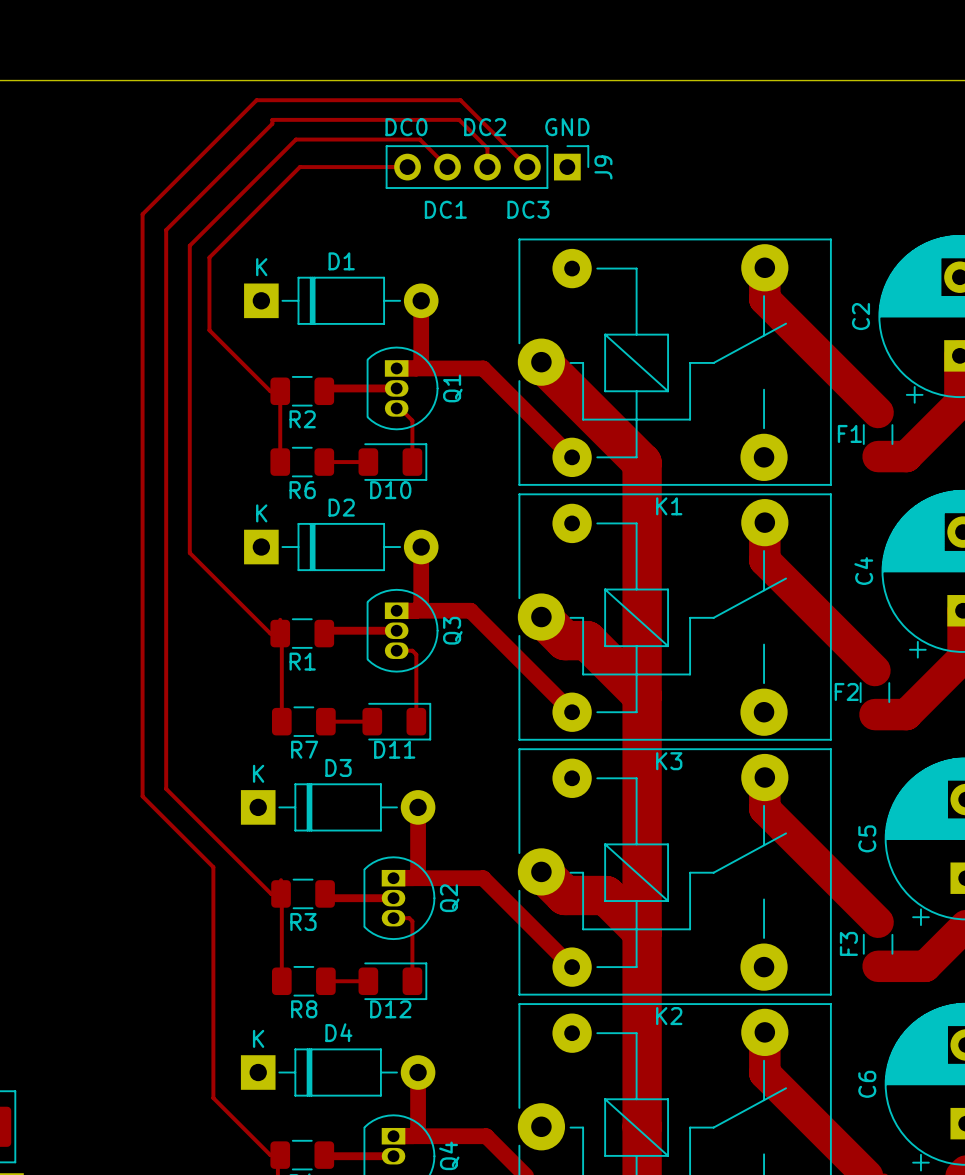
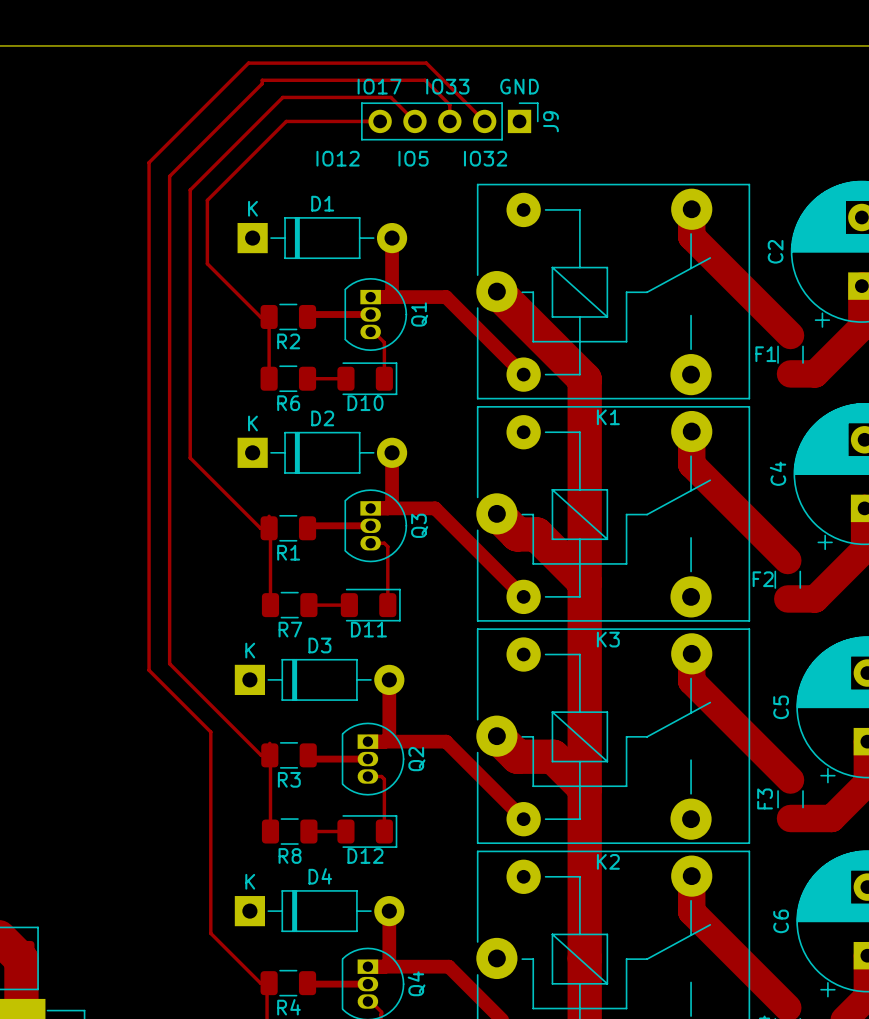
text: DC0 (406, 127) -> IO17 (379, 86)
text: DC2 (485, 127) -> IO33 (447, 86)
text: none -> IO12 (338, 158)
text: DC1 (445, 209) -> IO5 (413, 158)
text: DC3 (528, 209) -> IO32 (485, 158)

